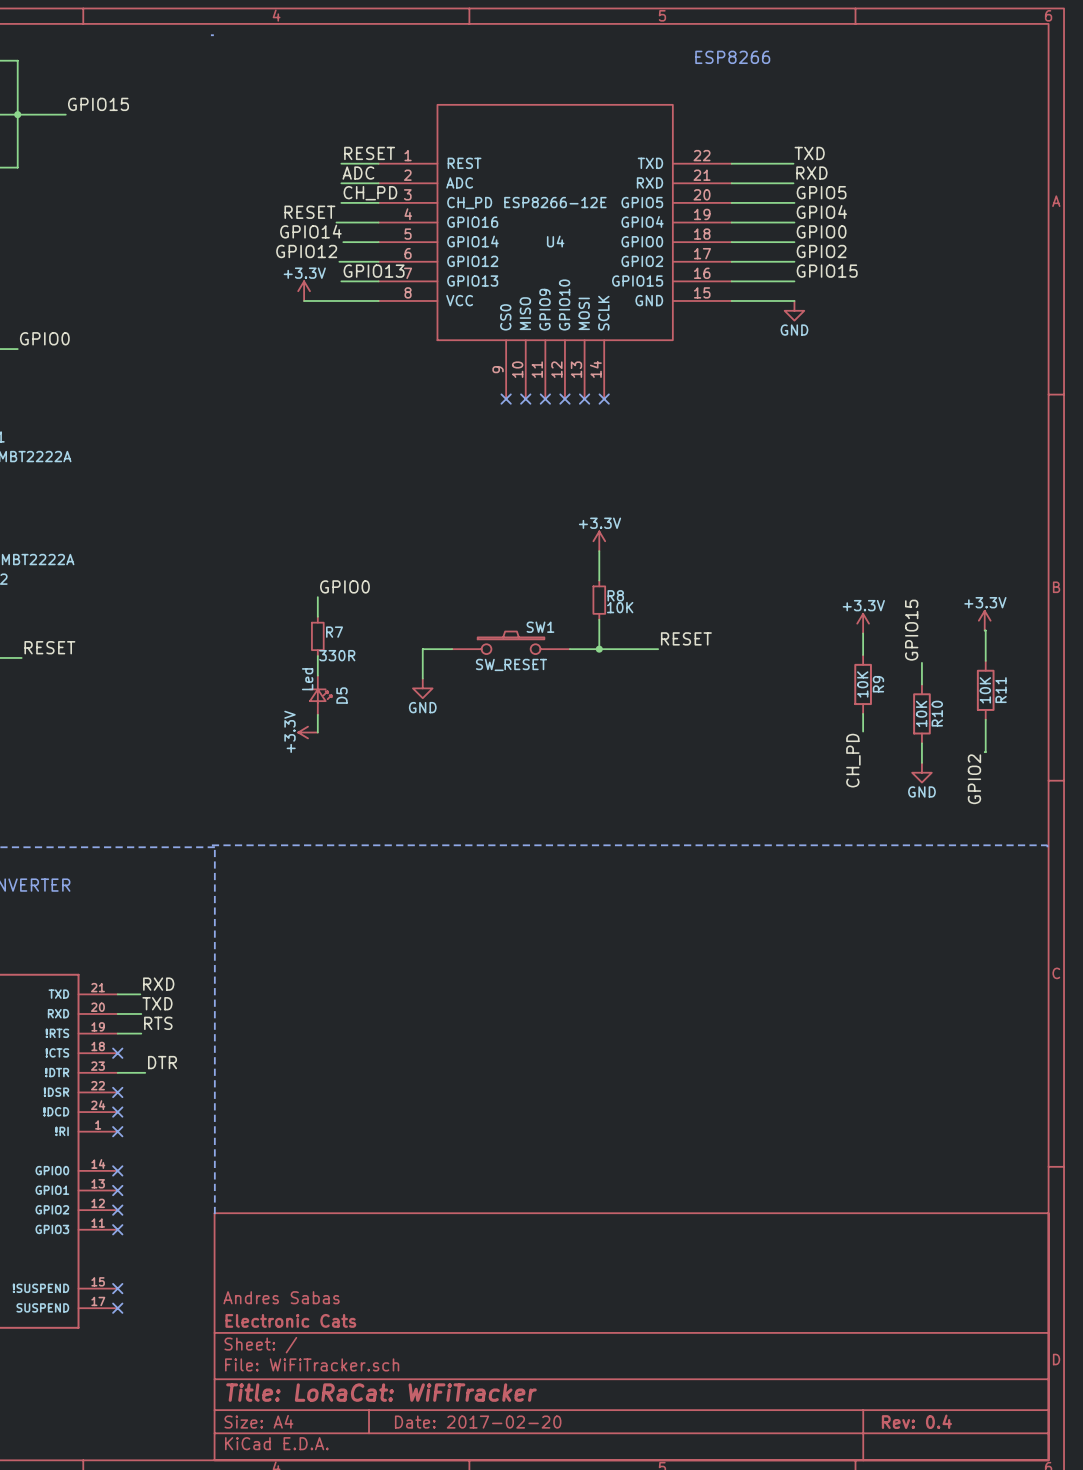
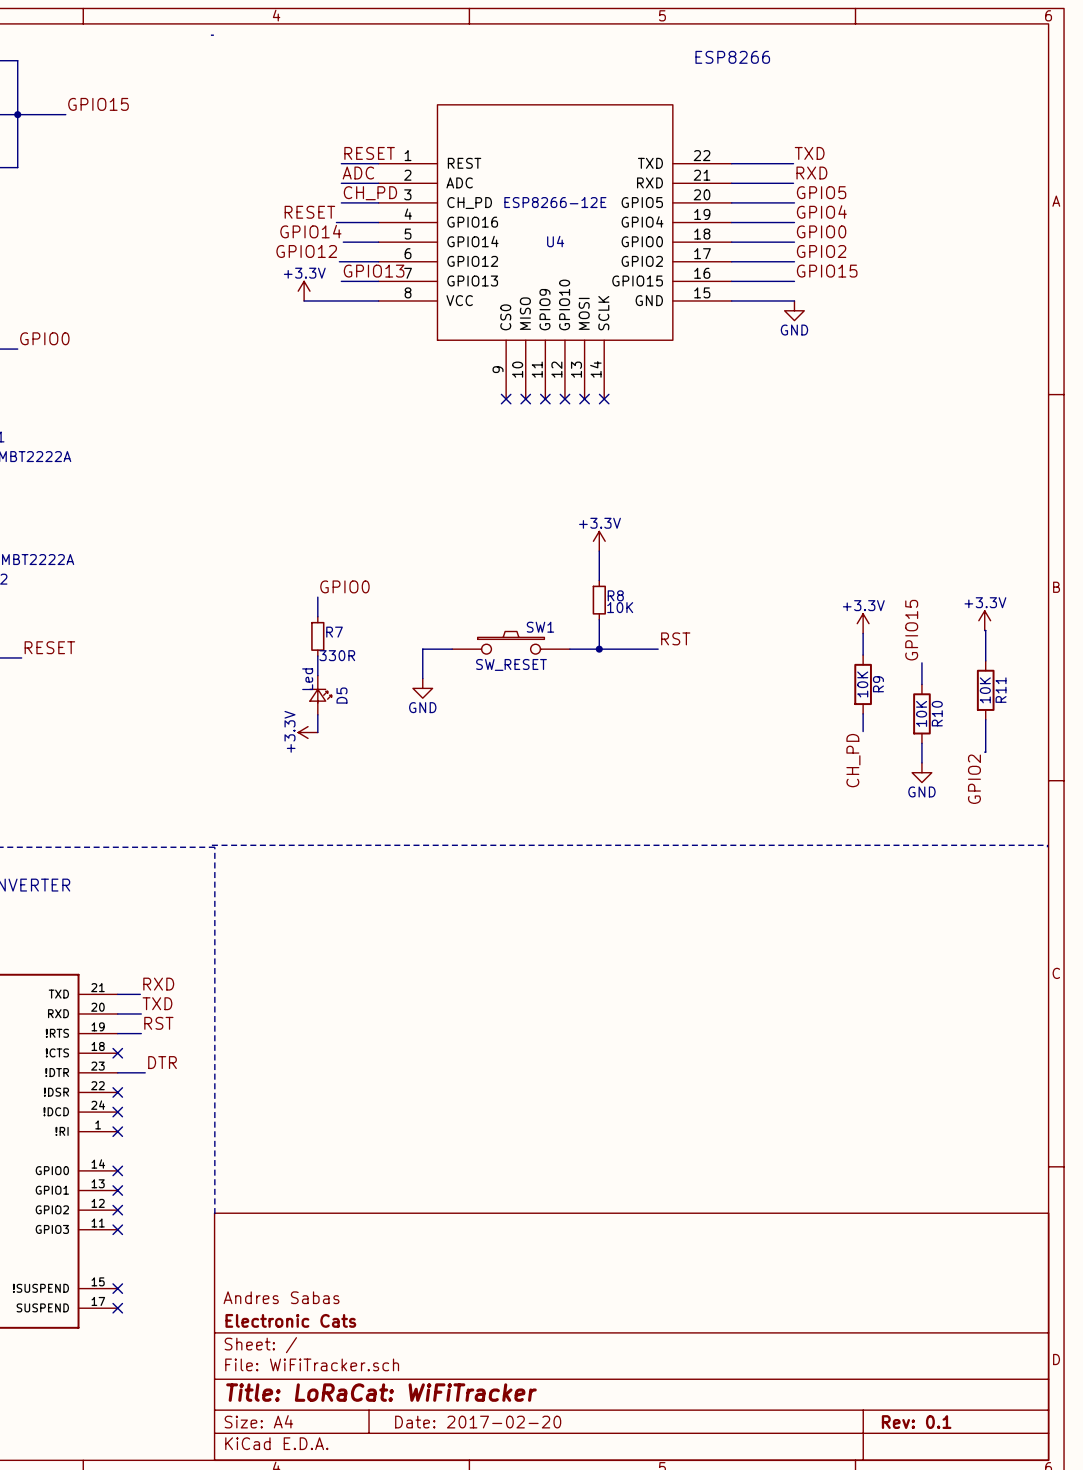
label: RESET (686, 638) -> RST (675, 638)
label: RTS (158, 1023) -> RST (158, 1023)
title block: Rev: 0.4 (916, 1421) -> Rev: 0.1 (916, 1422)

